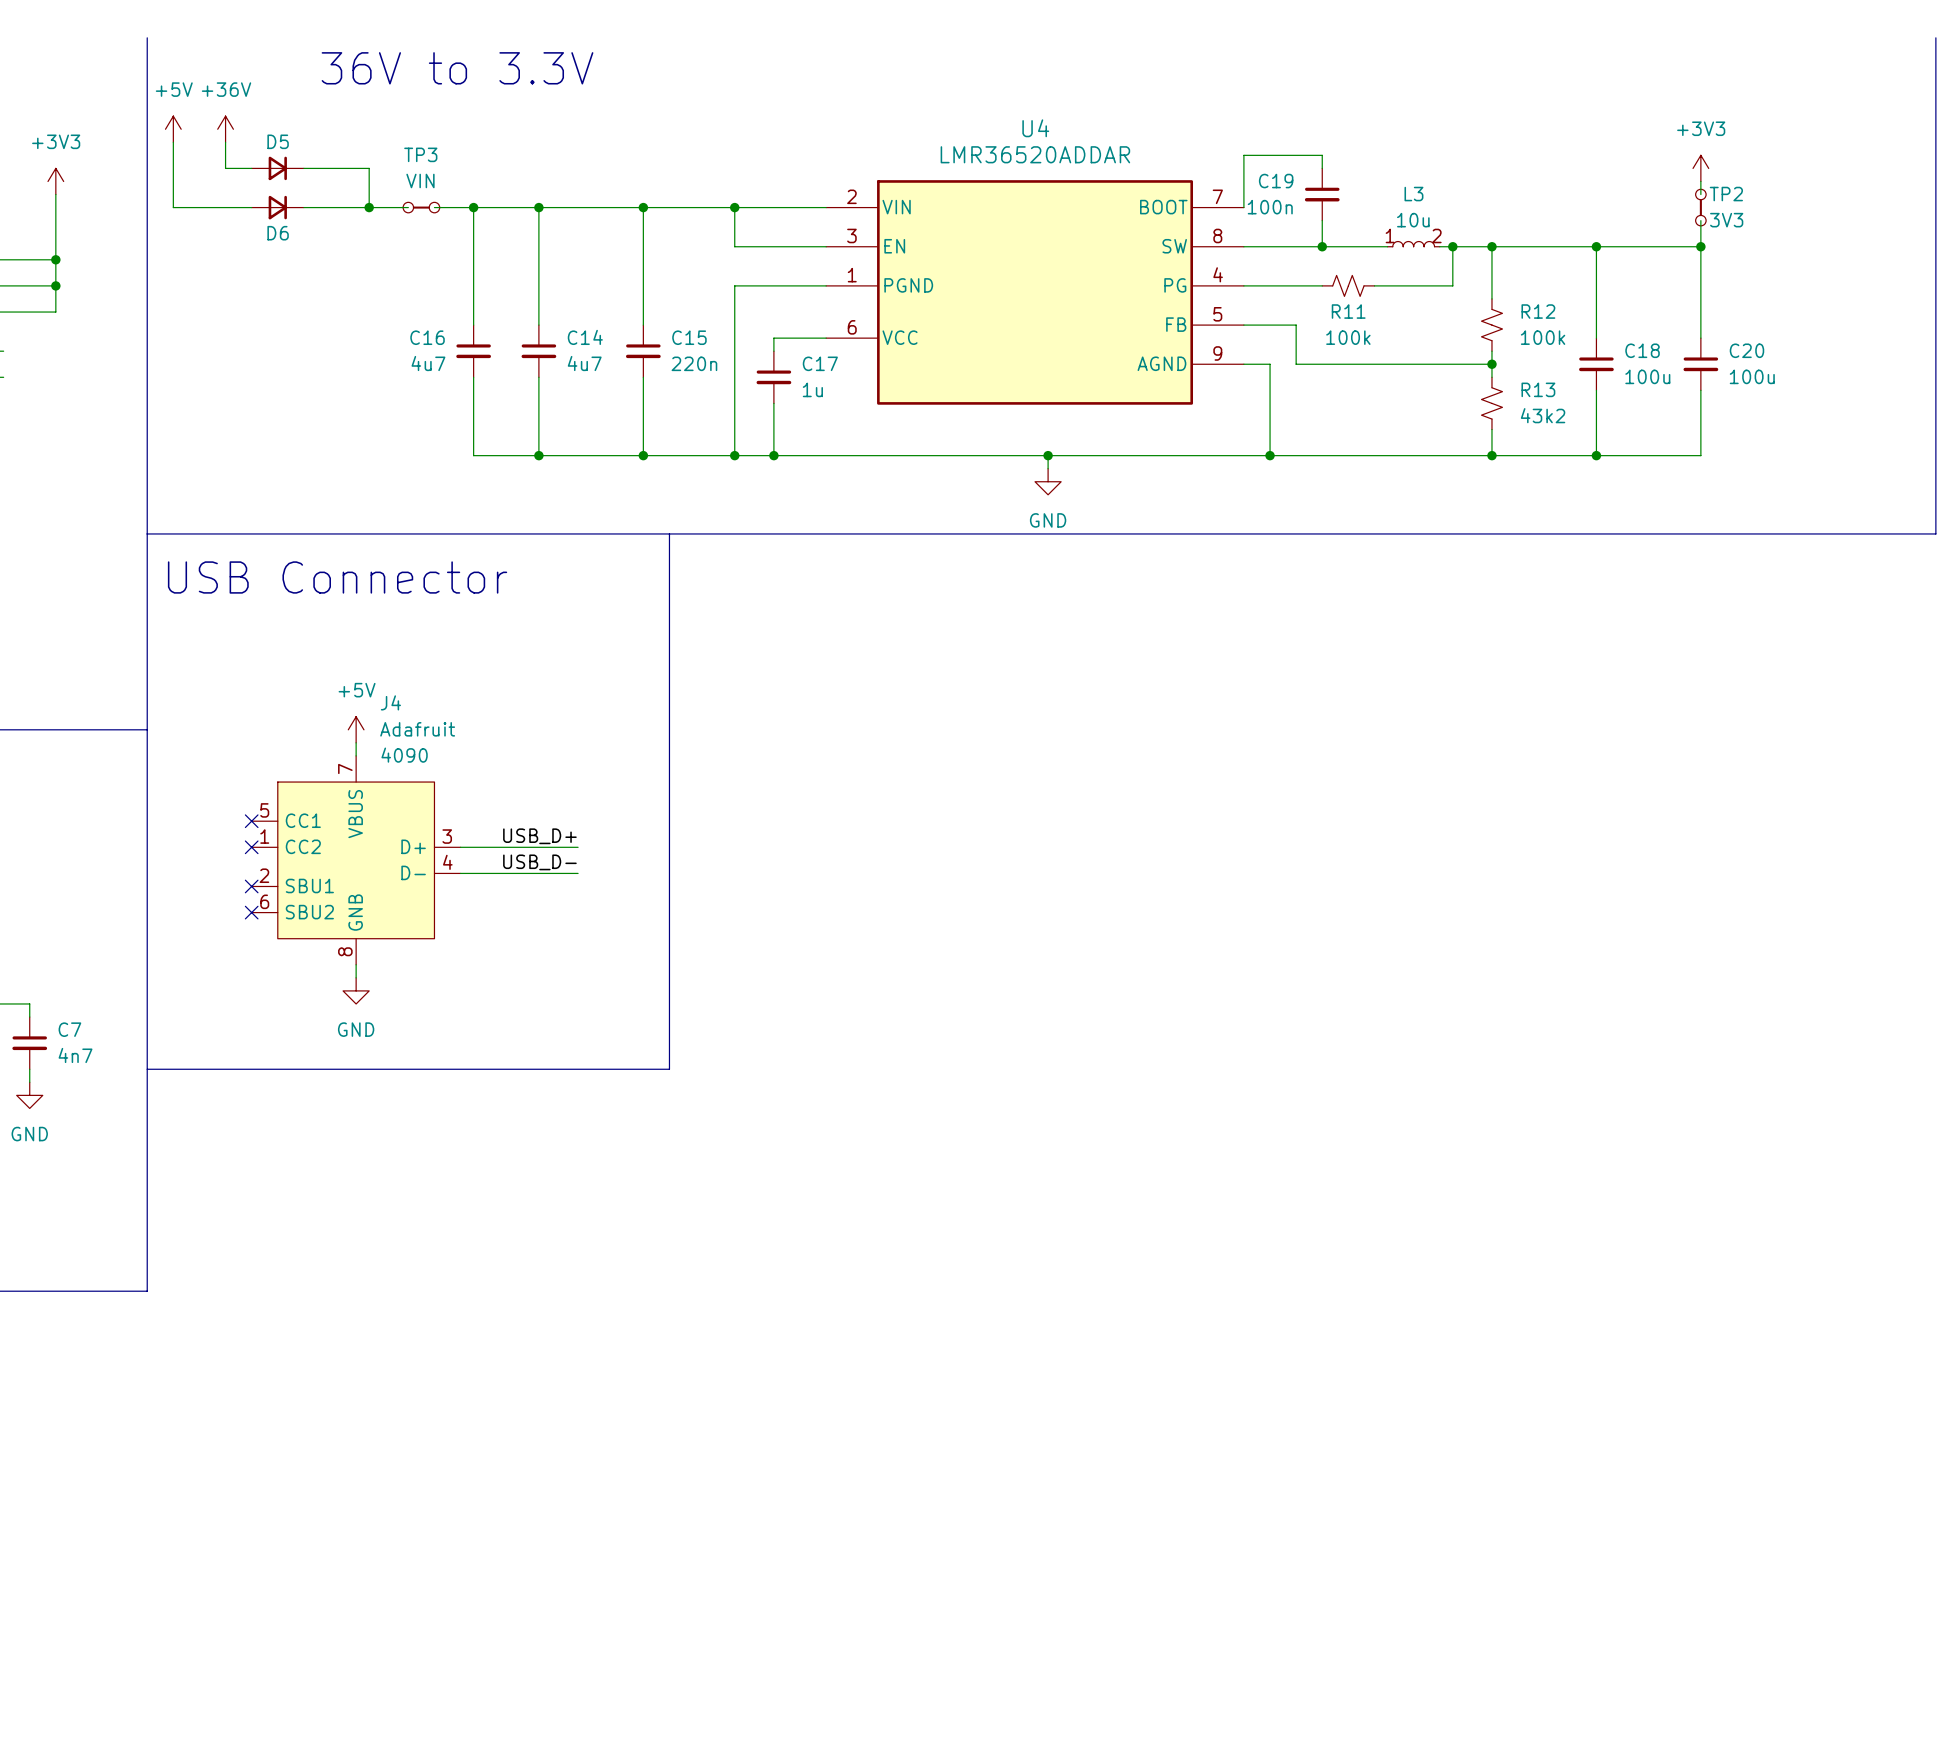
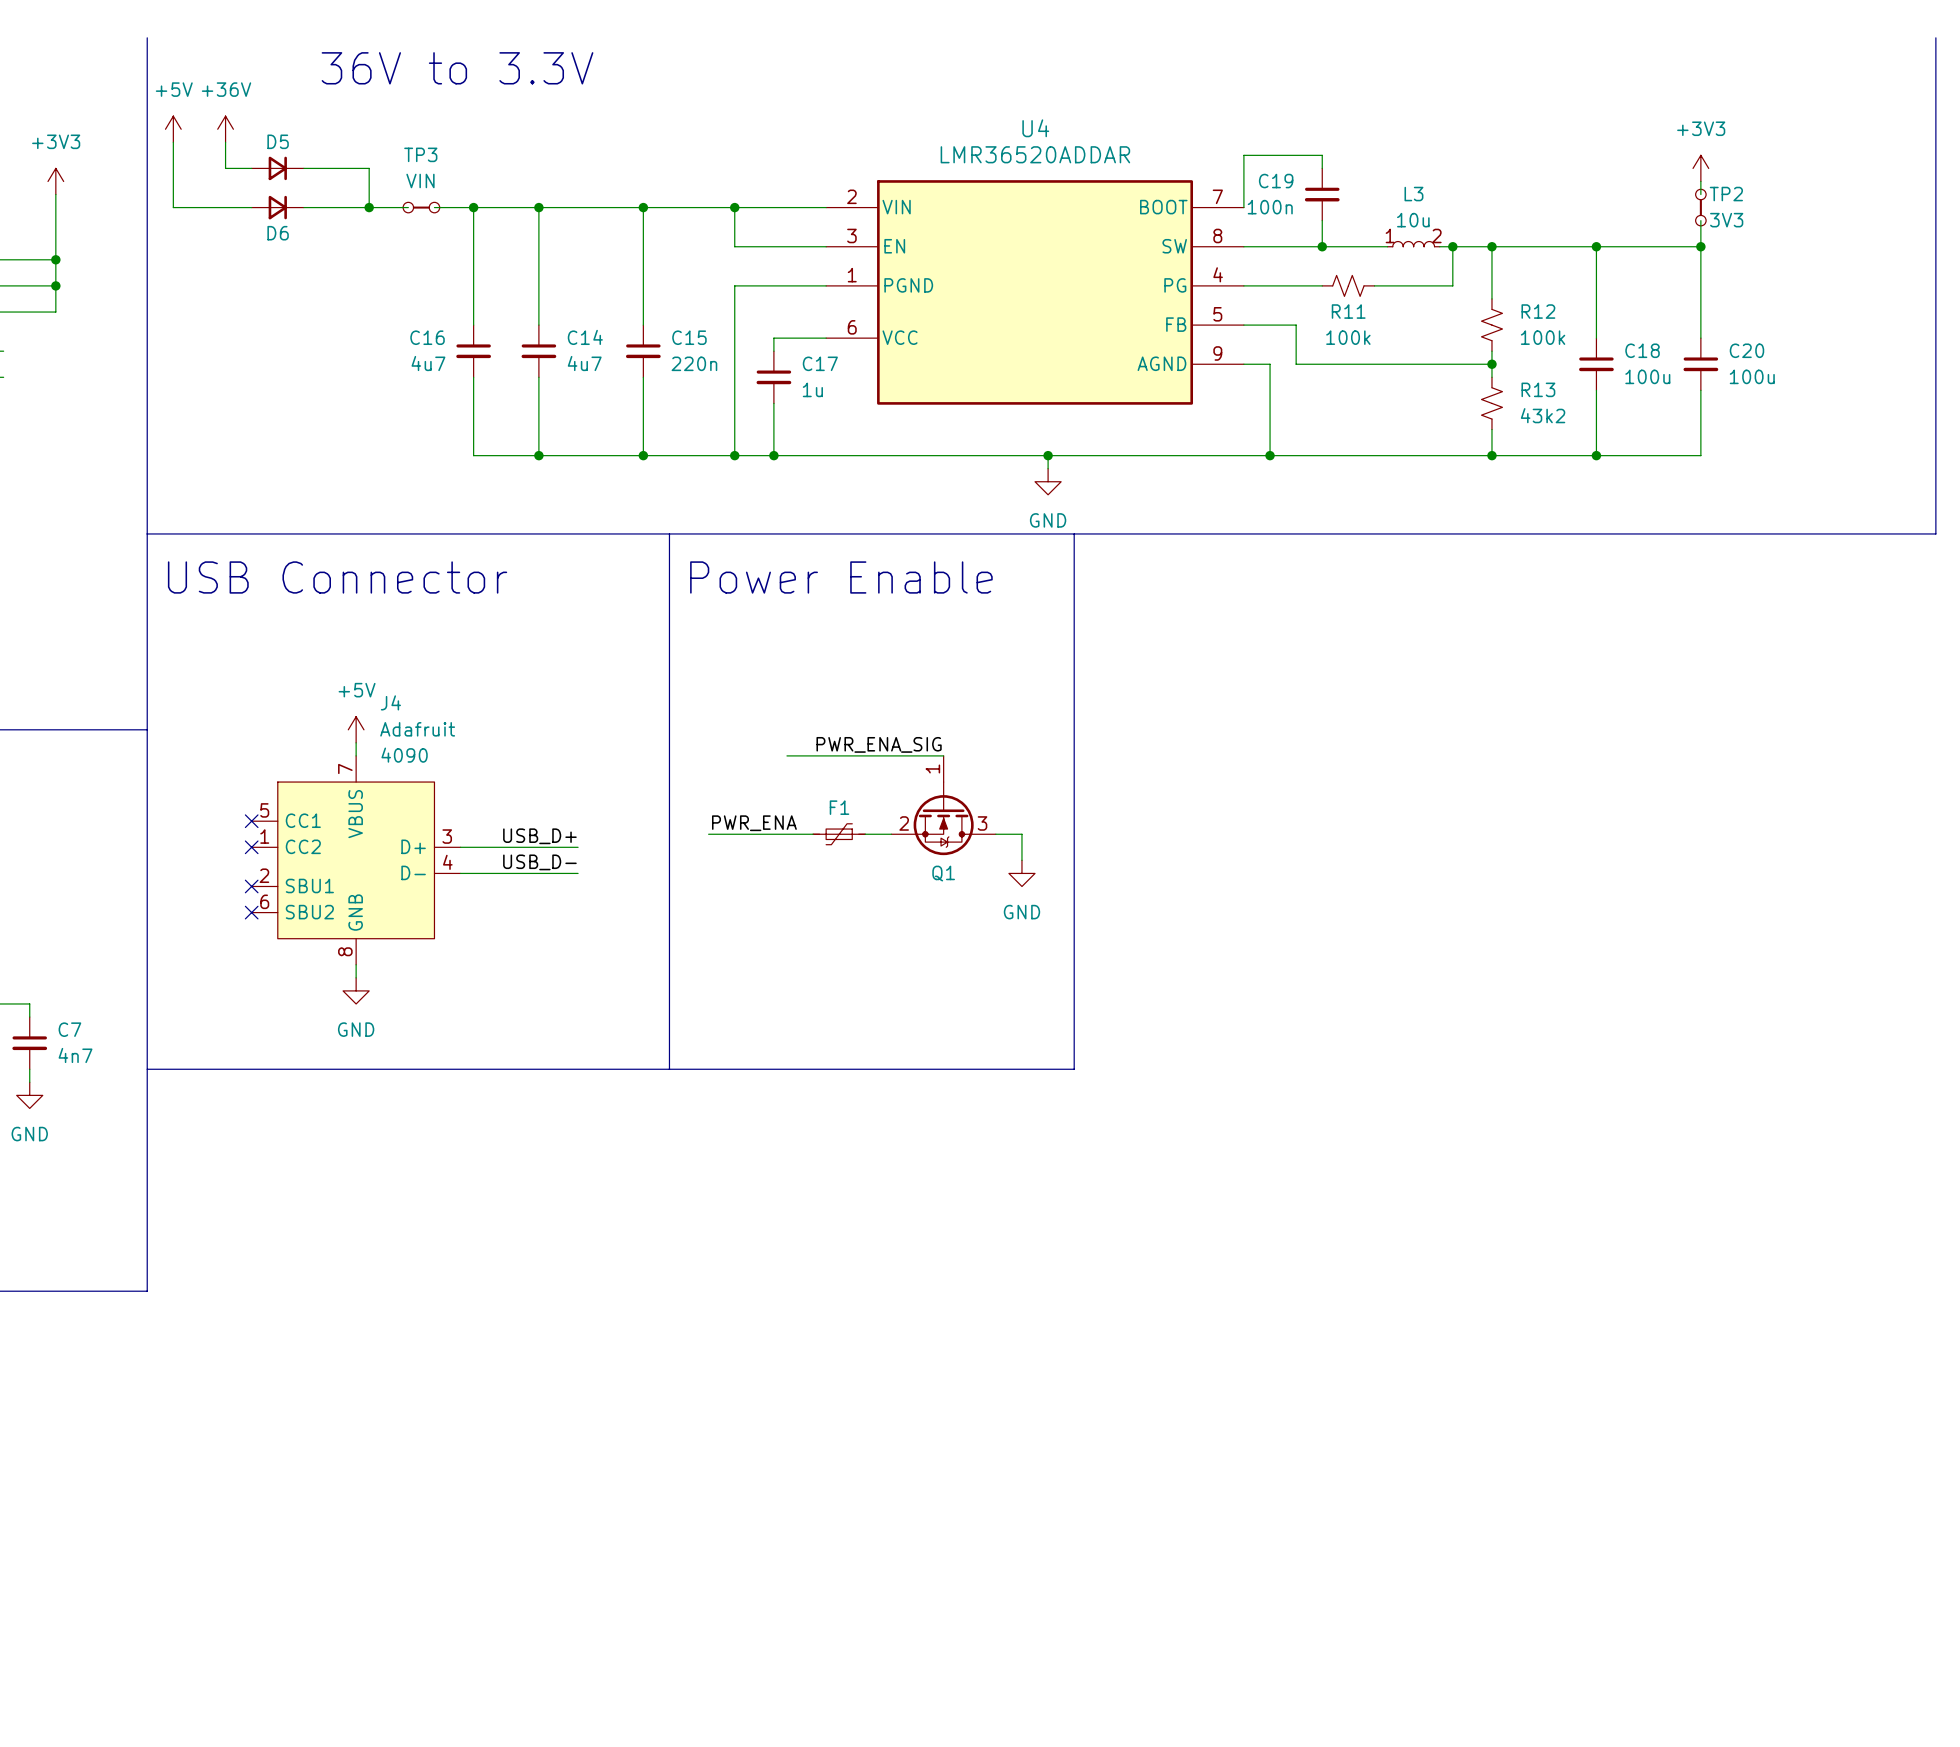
line: none -> (1074, 533) (1074, 1069) (669, 1069)
text: none -> Power Enable (841, 577)
label: none -> PWR_ENA_SIG (879, 744)
wire: none -> (786, 755) (943, 755)
Q1: none -> (943, 805)
label: none -> PWR_ENA (754, 823)
wire: none -> (708, 834) (813, 834)
F1: none -> (839, 834)
wire: none -> (865, 834) (891, 834)
wire: none -> (995, 834) (1021, 834) (1021, 860)
power symbol: none -> GND (1021, 873)

